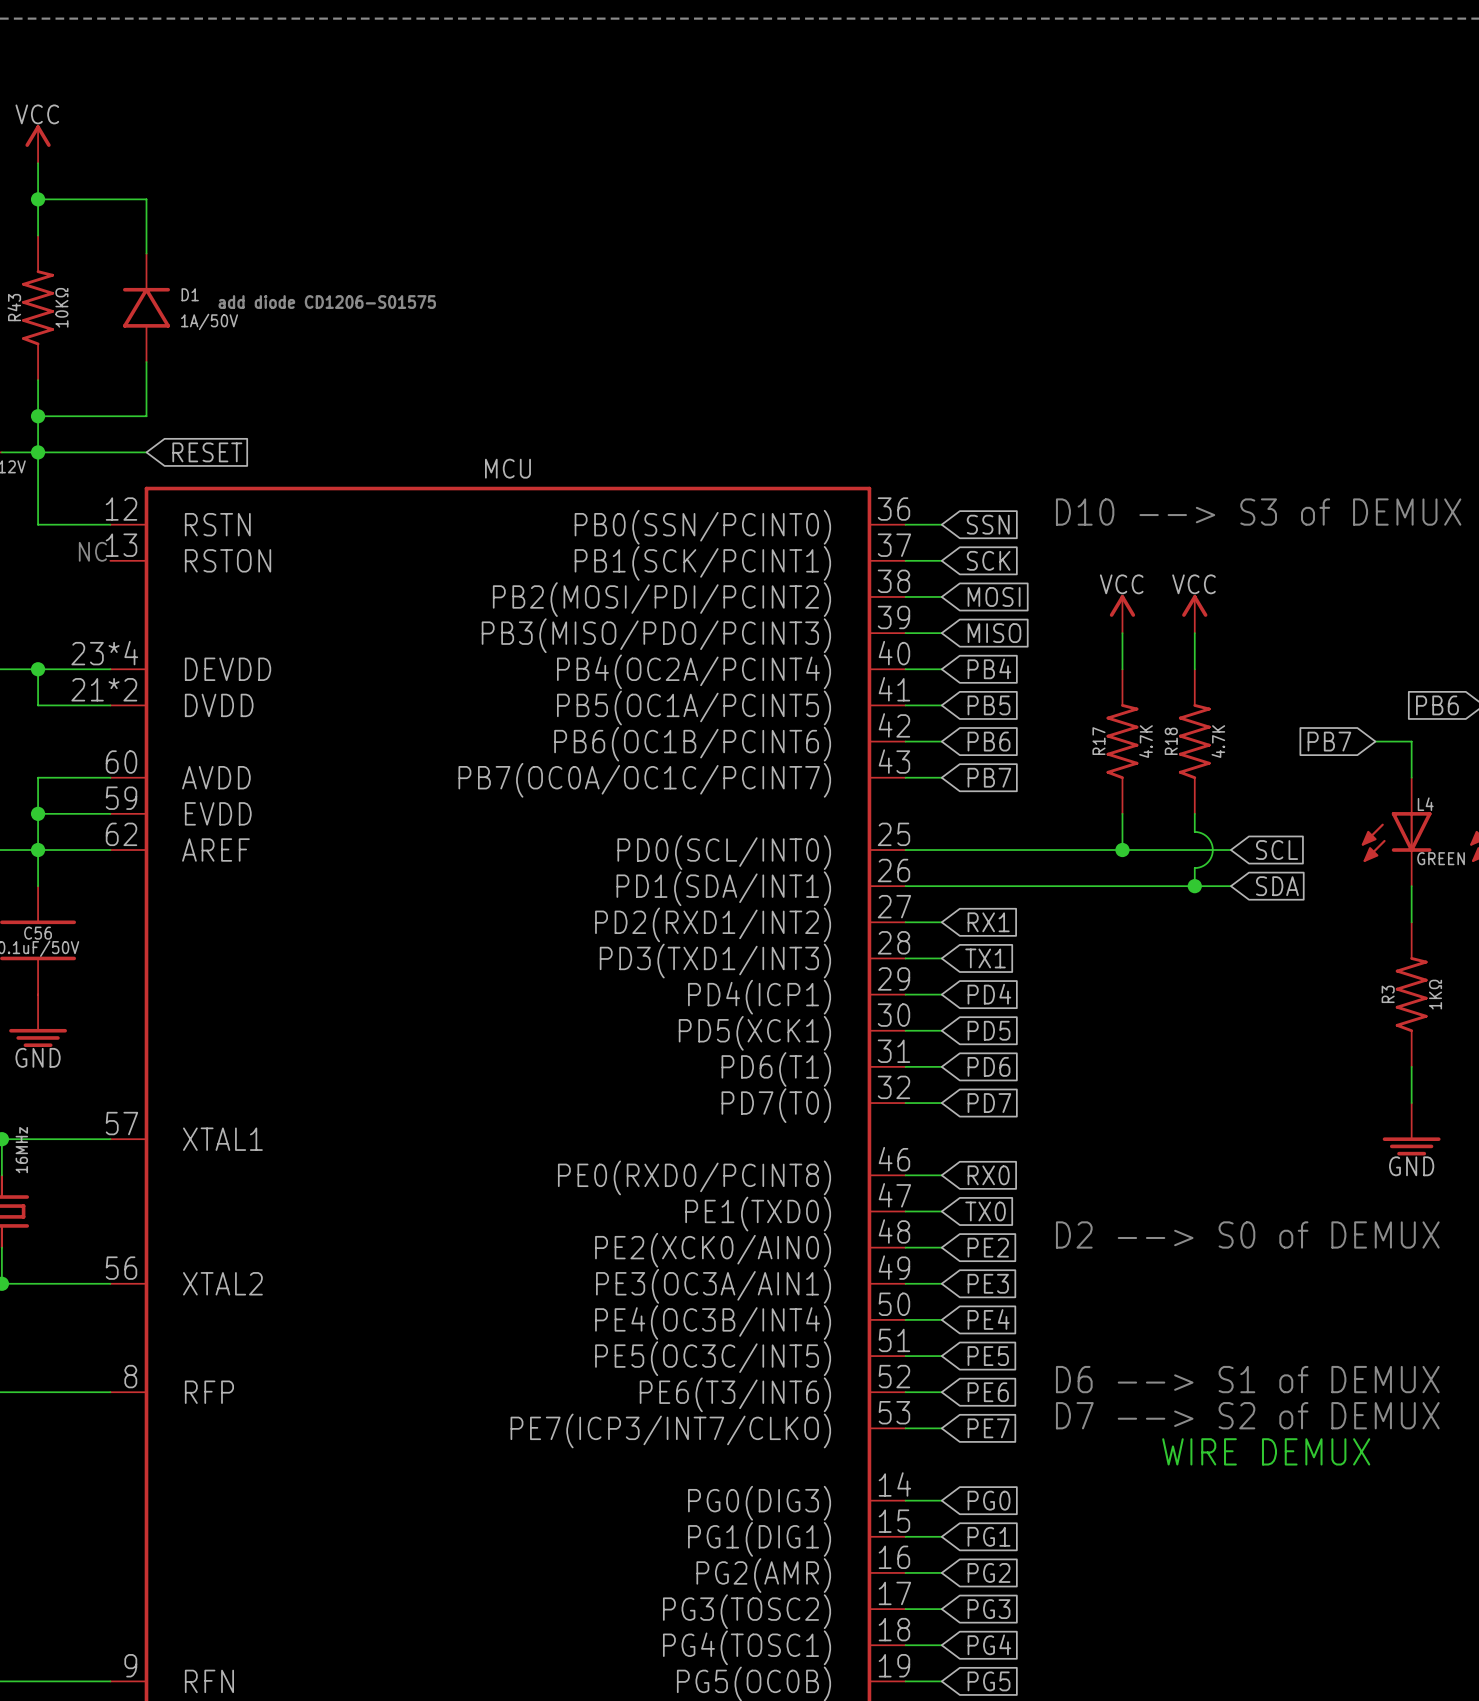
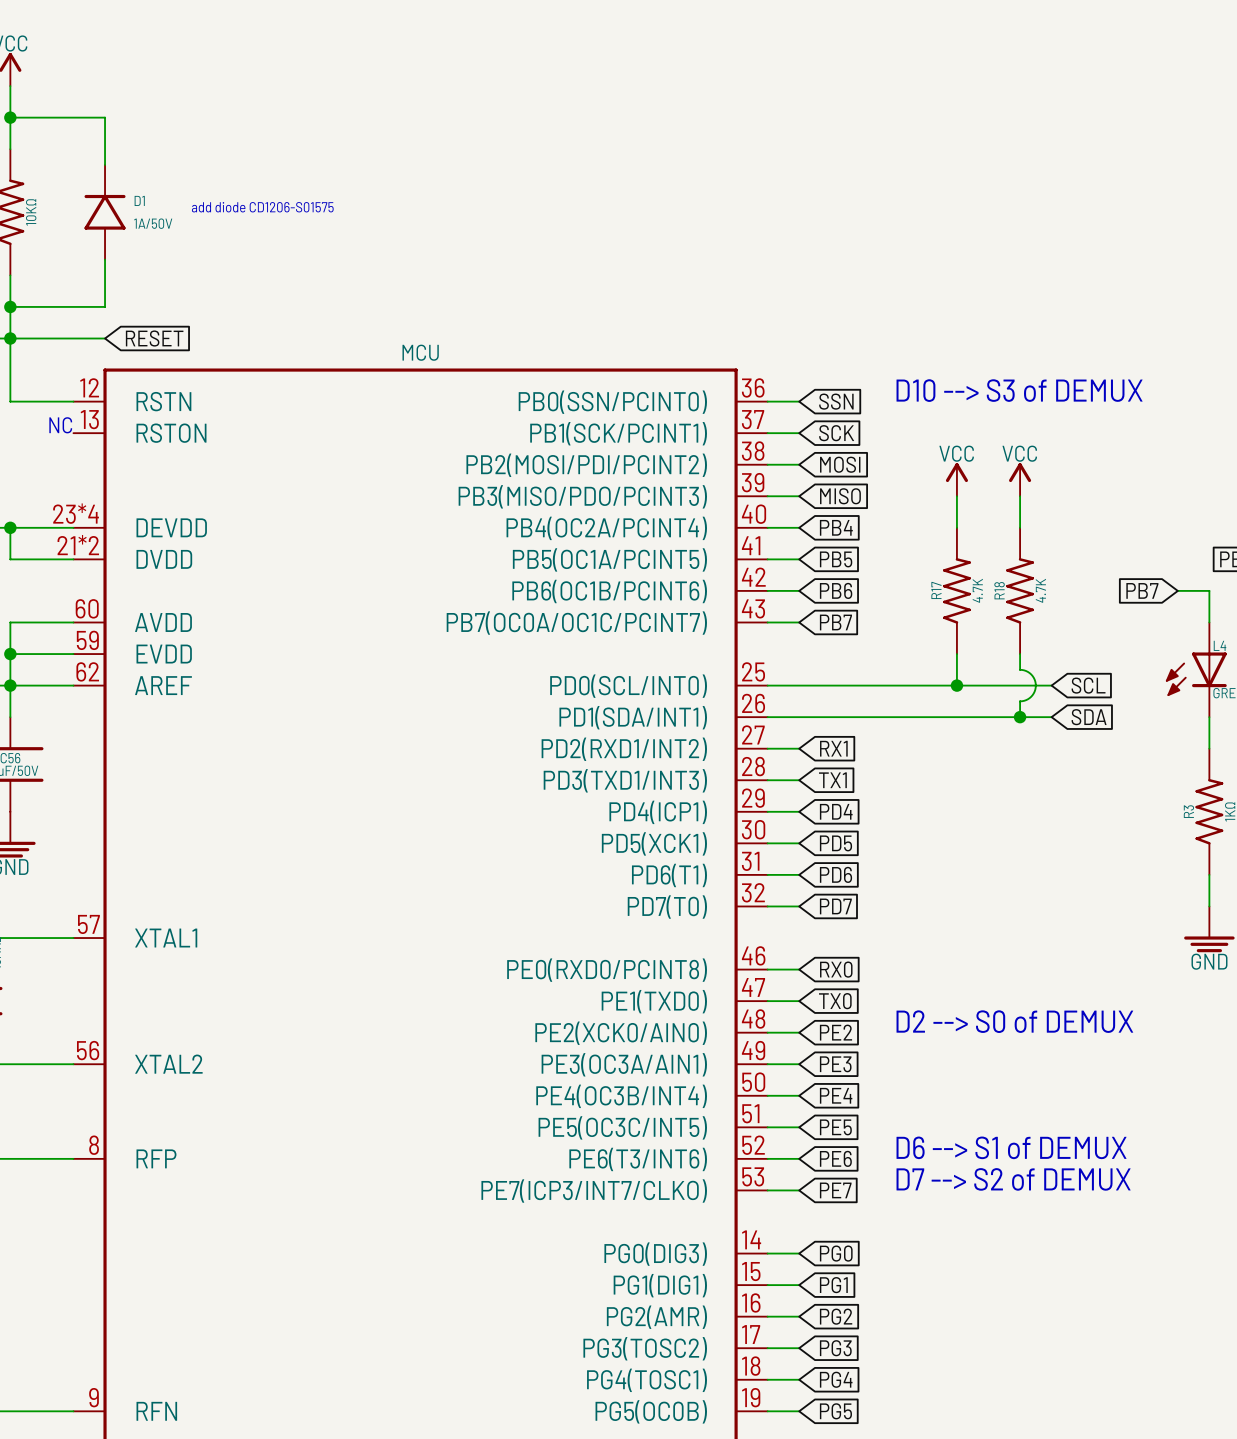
text: WIRE DEMUX (1266, 1451) -> none

